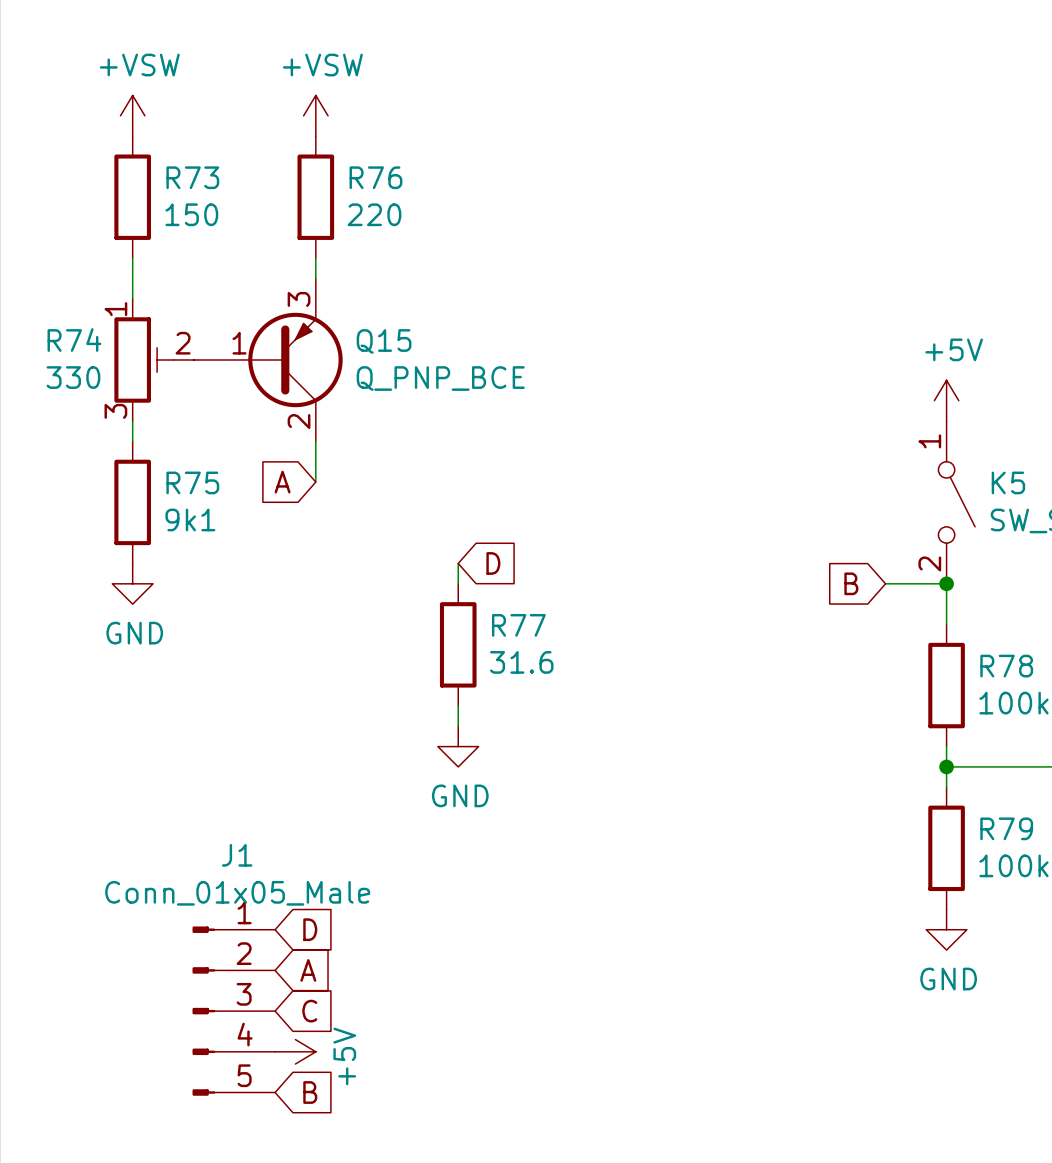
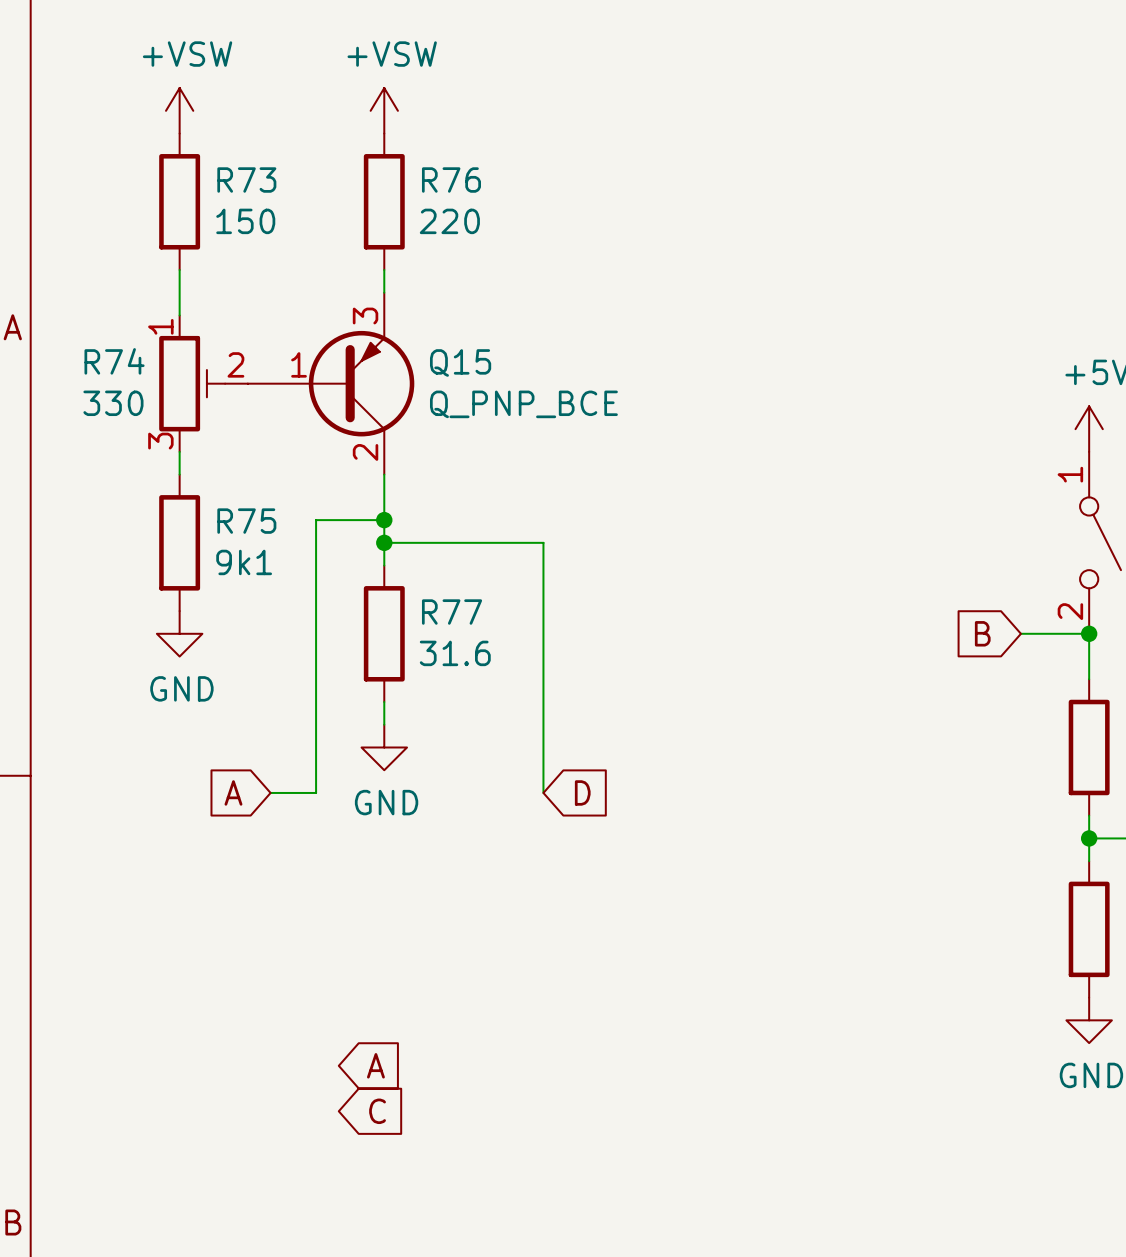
global label position: A (282, 482) -> A (233, 792)
junction: none -> (384, 520)
wire: none -> (384, 542) (543, 542) (543, 611)
junction: none -> (384, 542)
wire: none -> (384, 565) (384, 520) (316, 520) (316, 792) (270, 792)
global label: D (493, 563) -> none
wire: none -> (543, 633) (543, 770)
wire: none -> (384, 702) (384, 724)
R77 position: (458, 644) -> (384, 633)
global label: none -> D (582, 792)
power symbol position: GND (458, 746) -> GND (384, 747)
global label: D (310, 929) -> none
J1: Conn_01x05_Male (233, 1011) -> none
power symbol: +5V (295, 1051) -> none
global label: B (310, 1092) -> none

